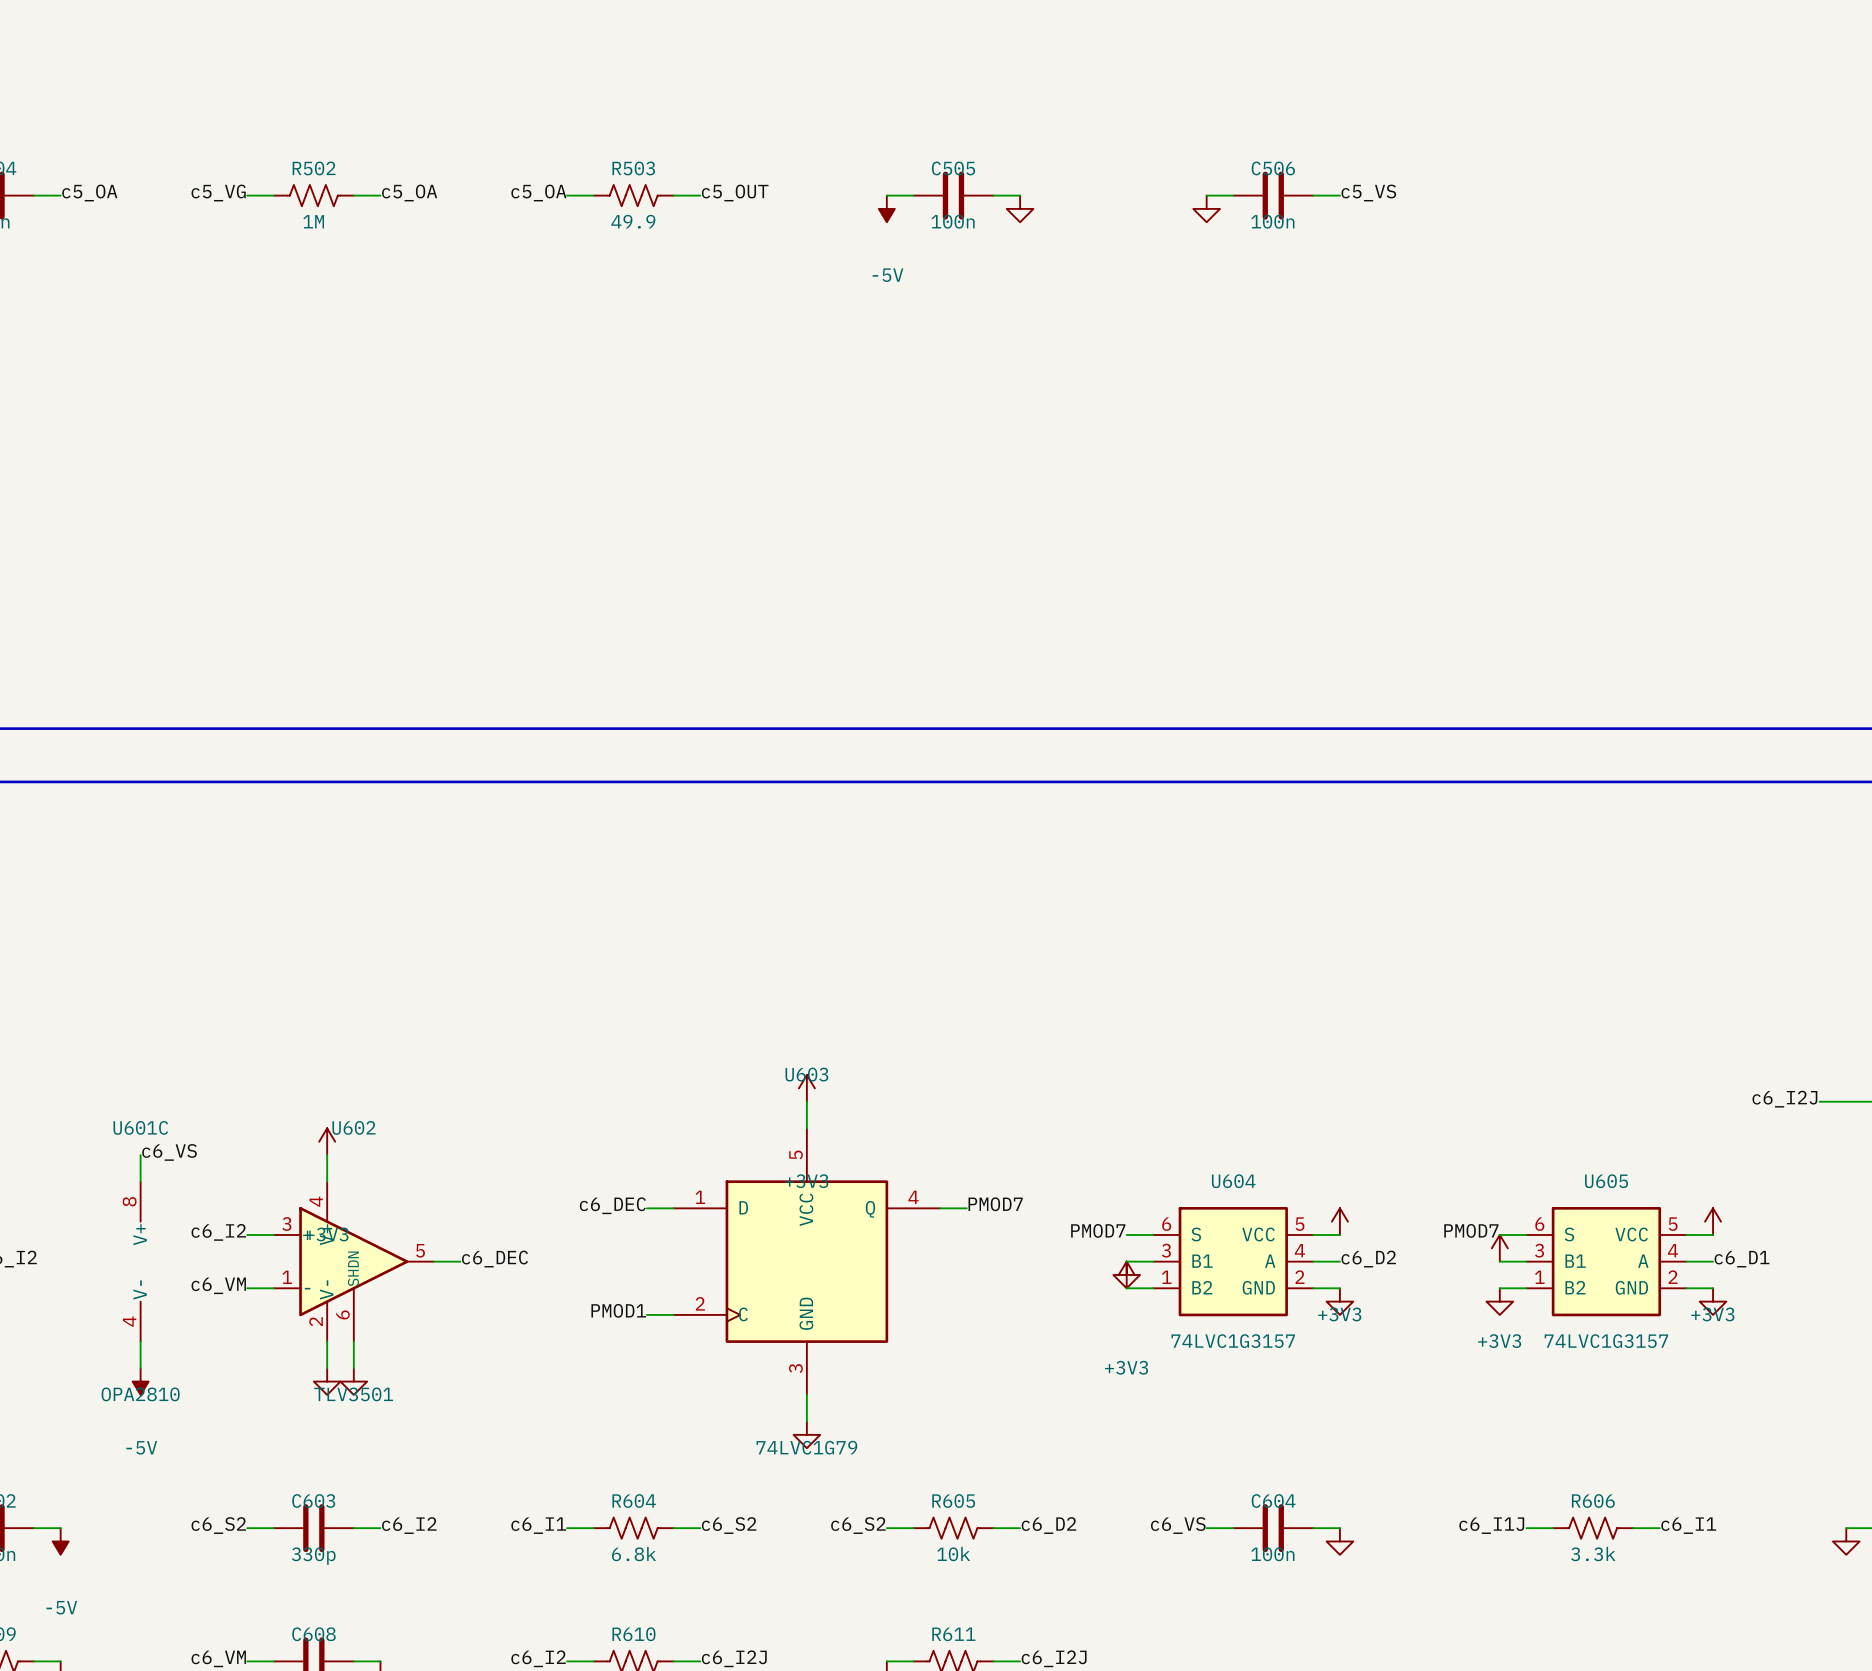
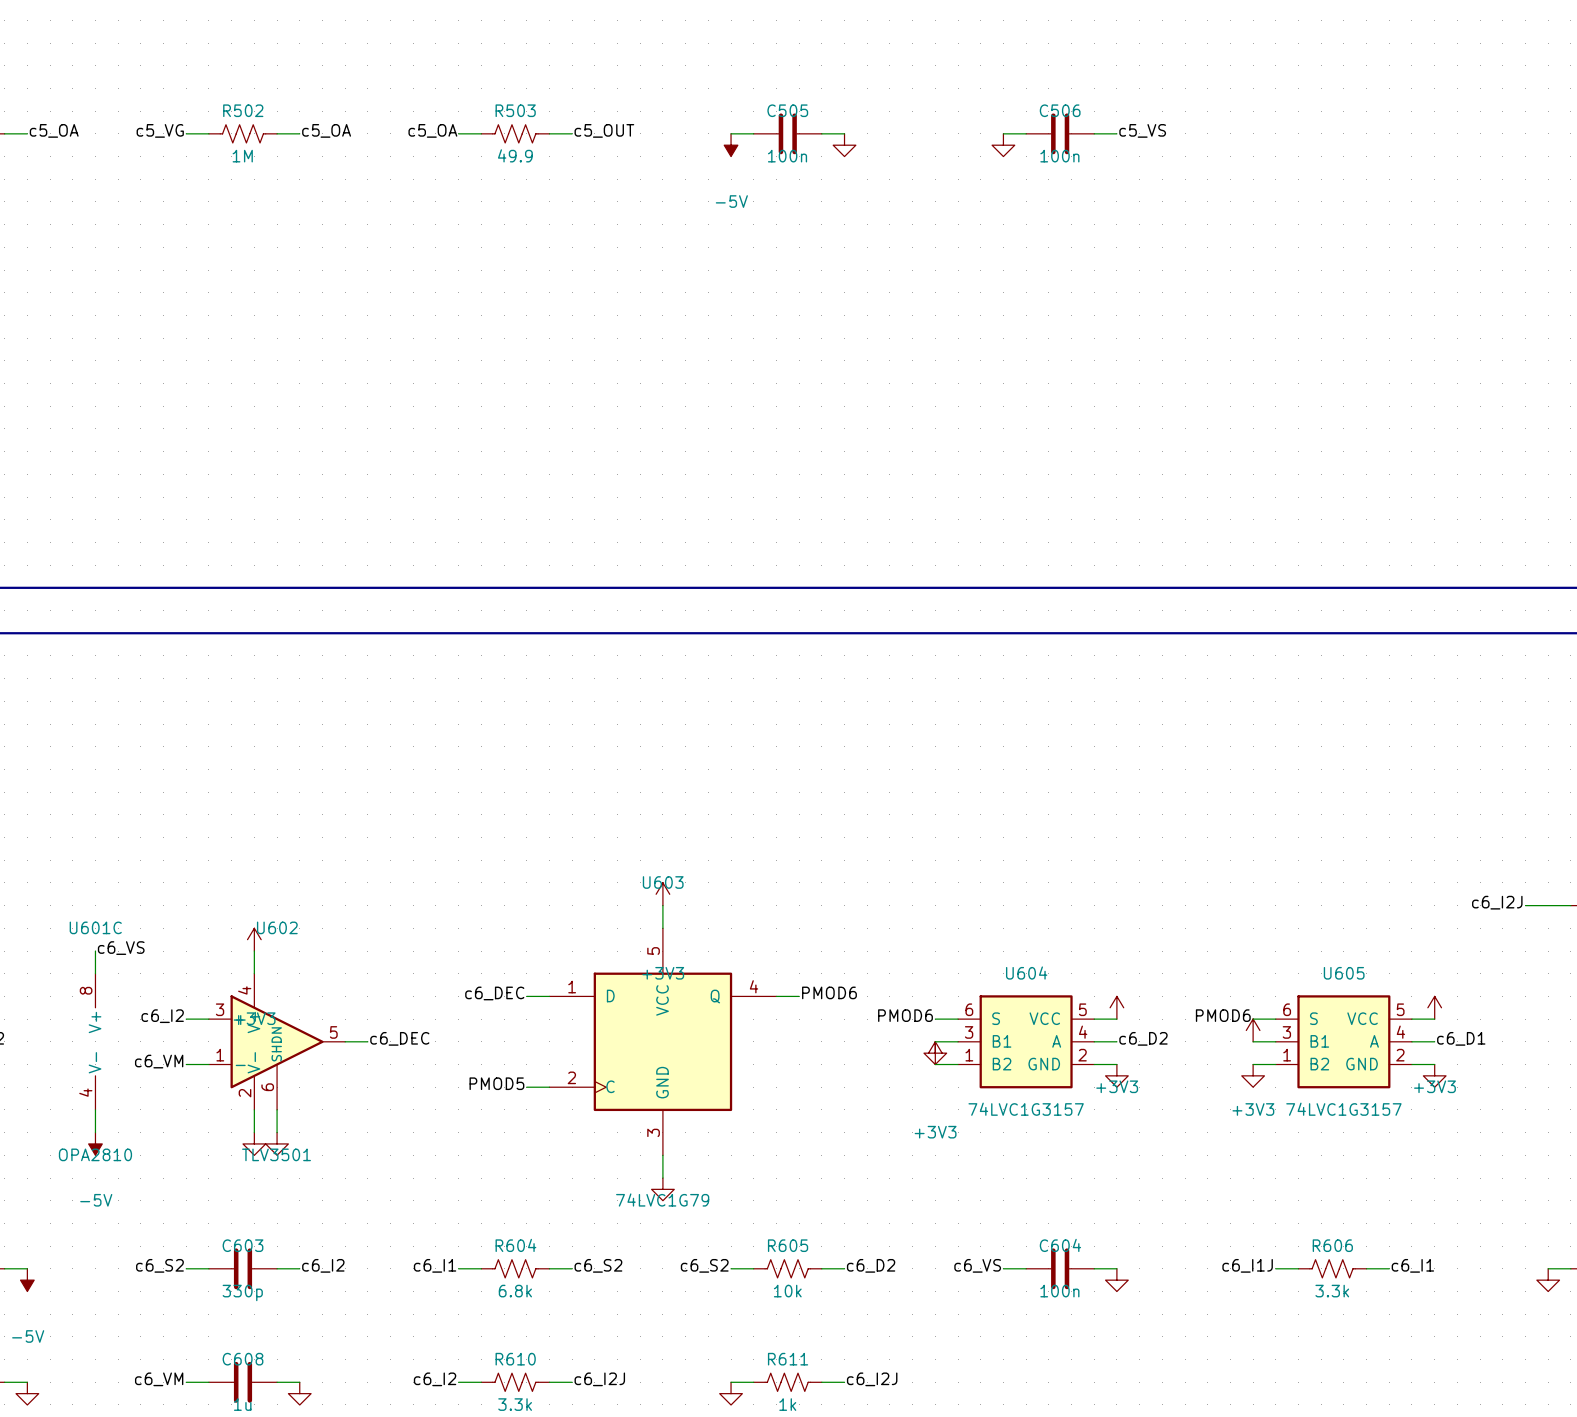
label: PMOD7 (995, 1204) -> PMOD6 (829, 992)
label: PMOD7 (1098, 1230) -> PMOD6 (905, 1015)
label: PMOD7 (1471, 1230) -> PMOD6 (1223, 1015)
label: PMOD1 (618, 1310) -> PMOD5 (496, 1083)

